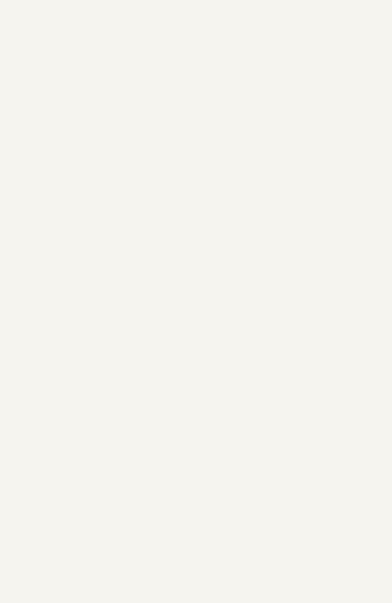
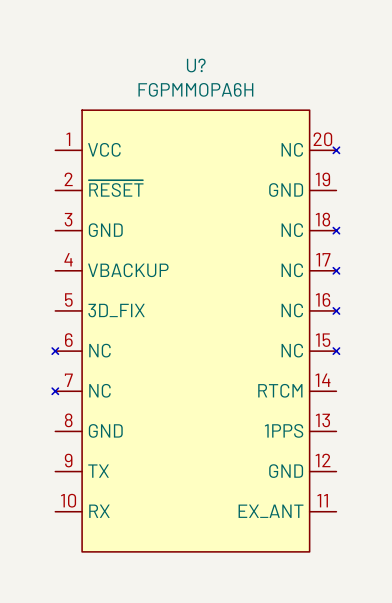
U?: none -> FGPMMOPA6H (195, 331)

